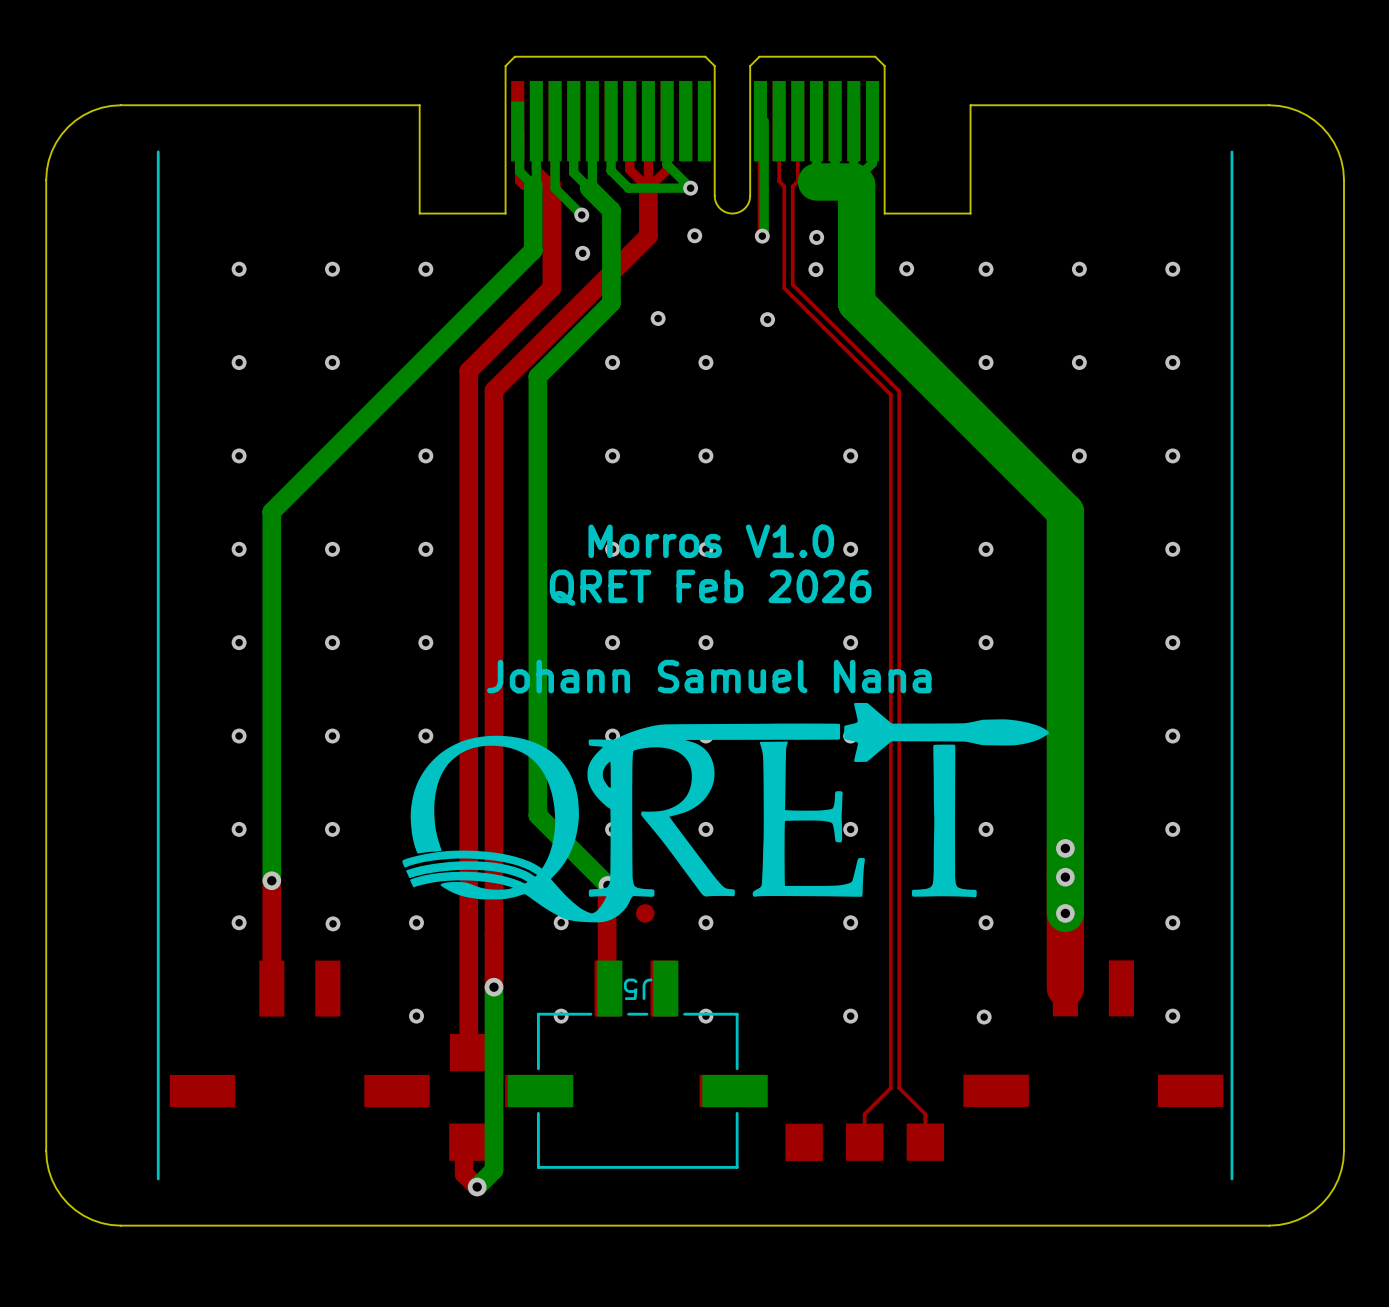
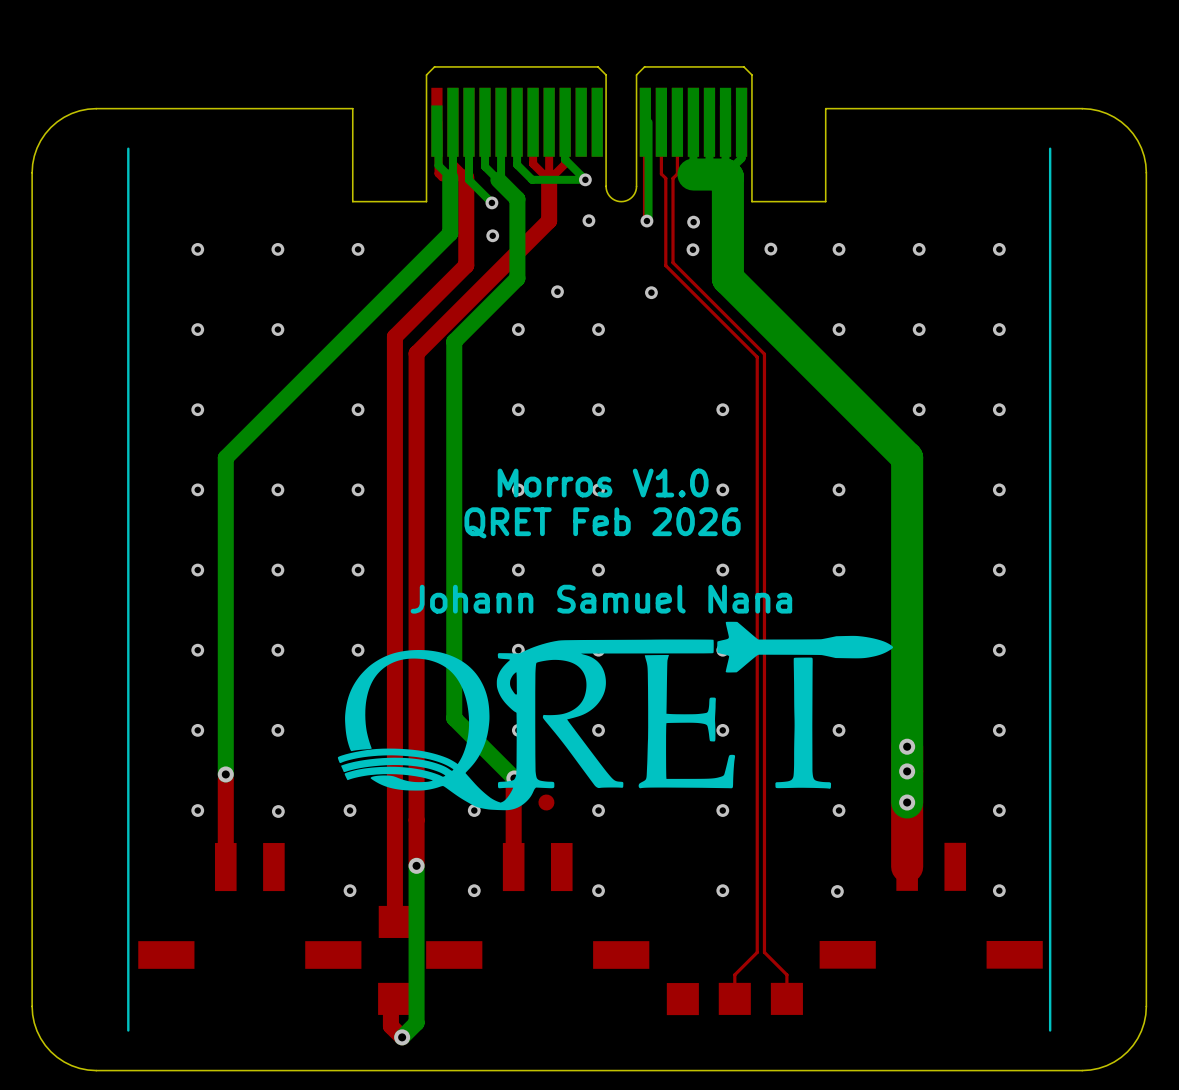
J5: (637, 1064) -> none

